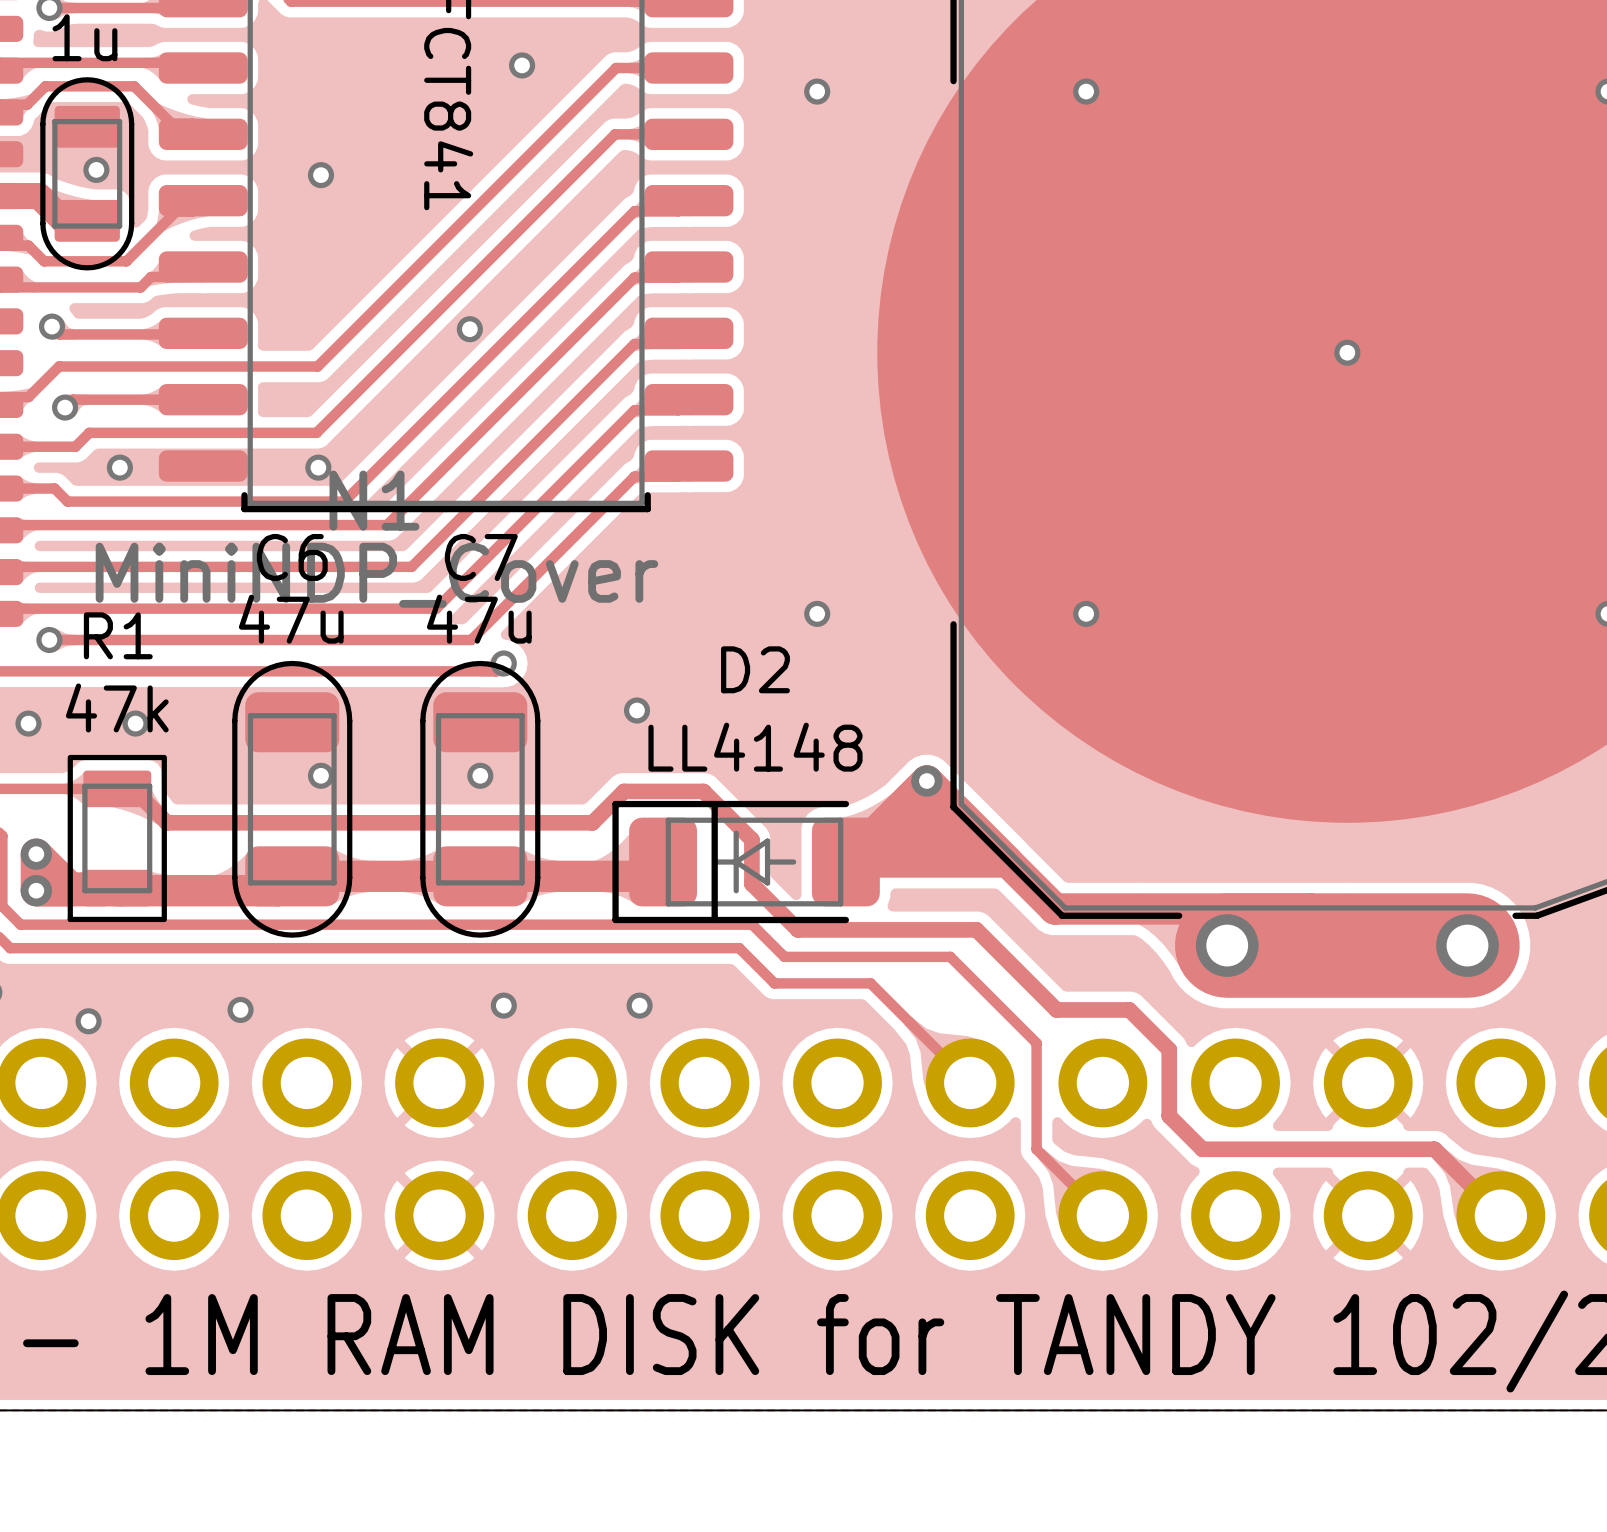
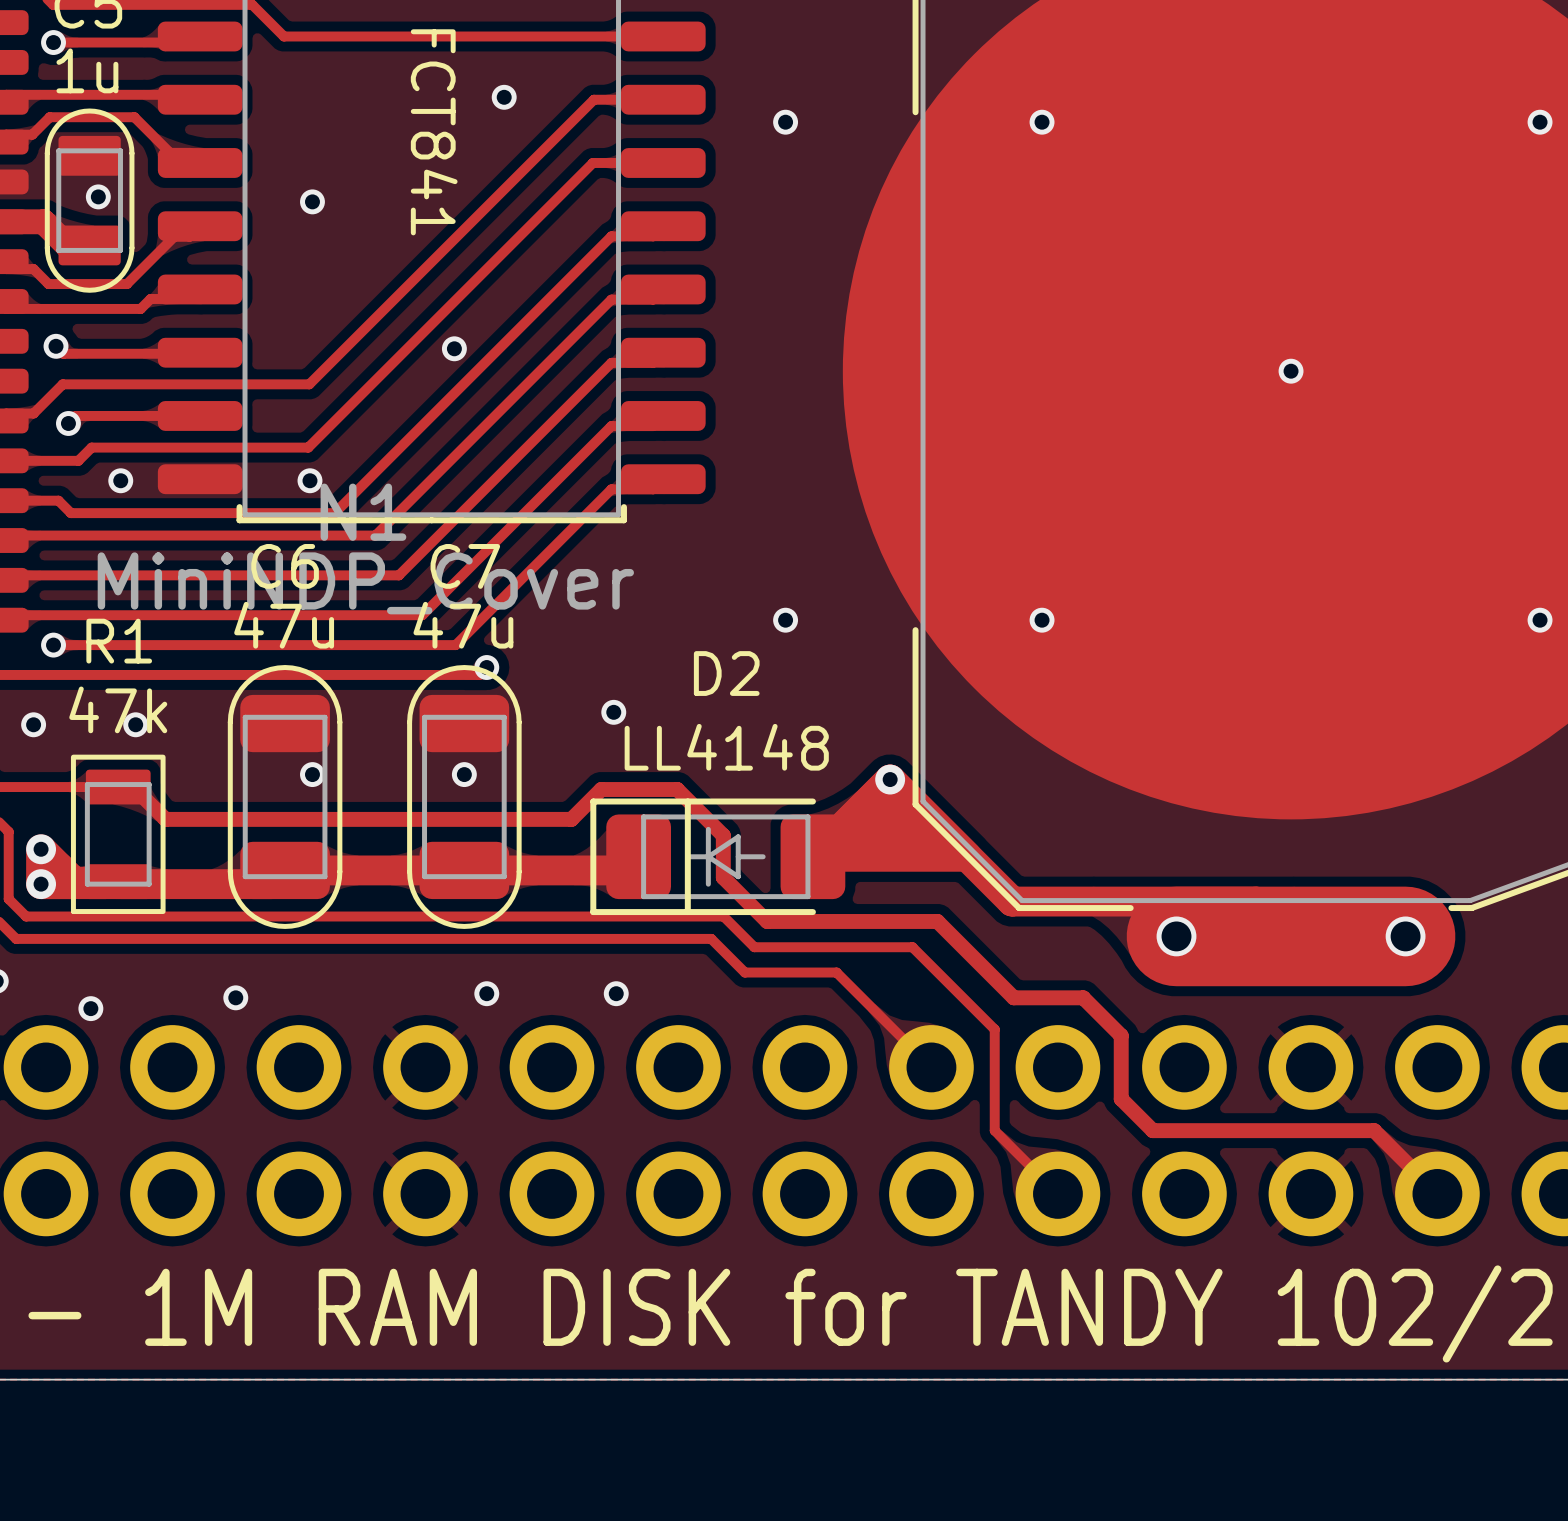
via size: [1195, 914, 1259, 977] -> [1156, 916, 1197, 957]
via size: [1436, 914, 1499, 977] -> [1385, 916, 1426, 957]

